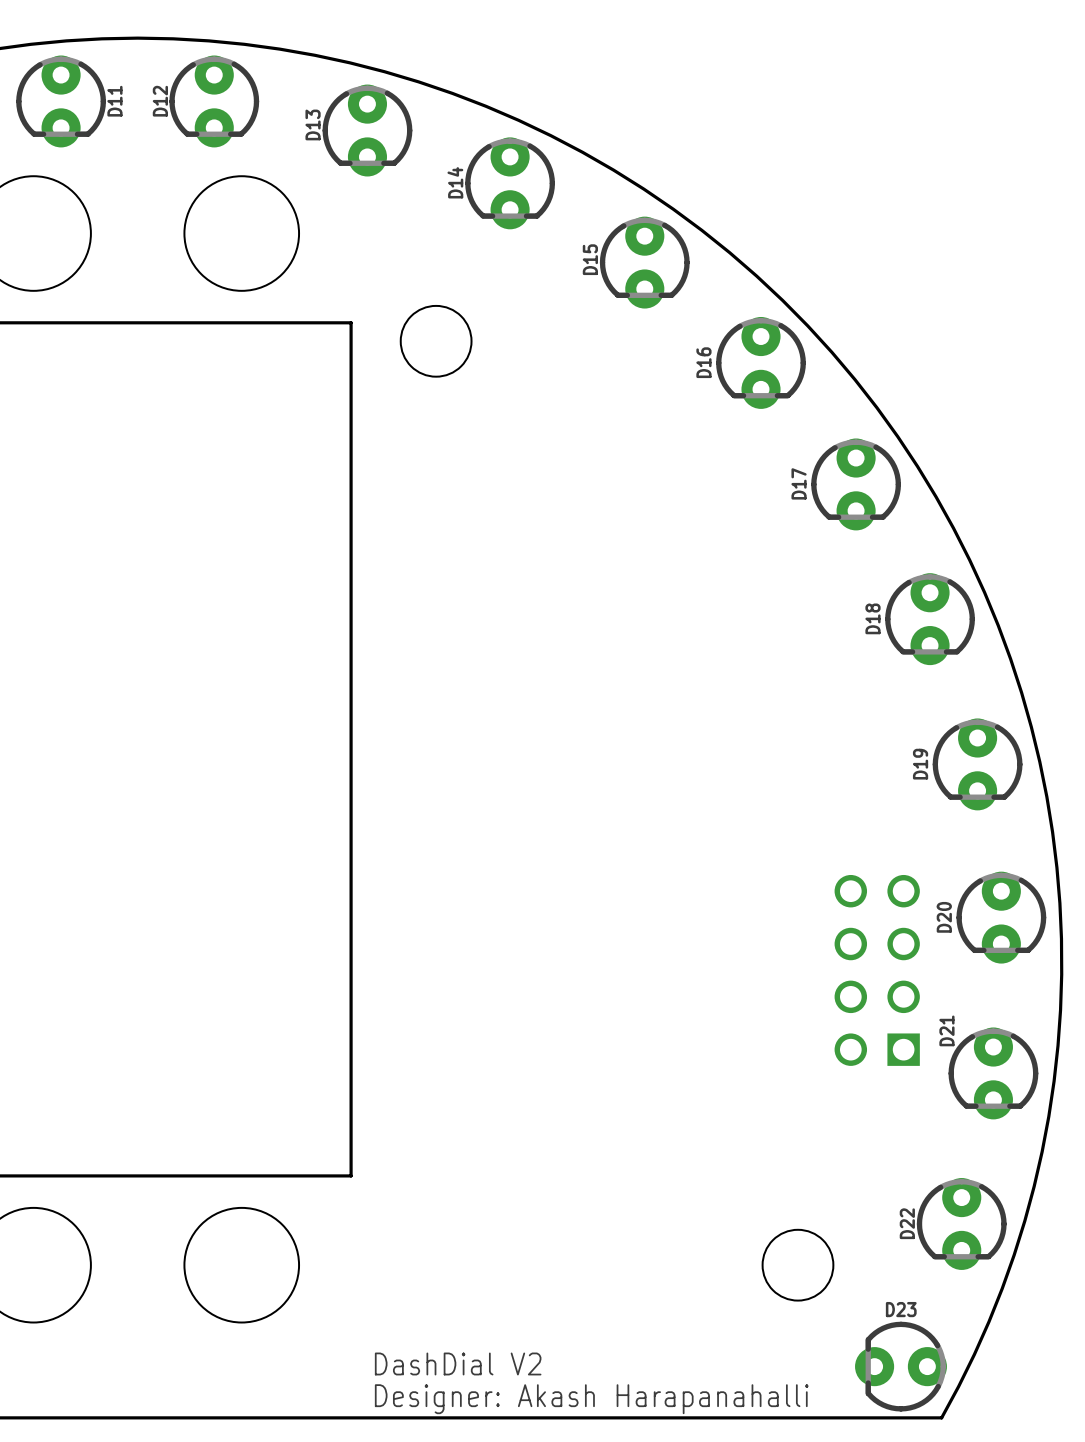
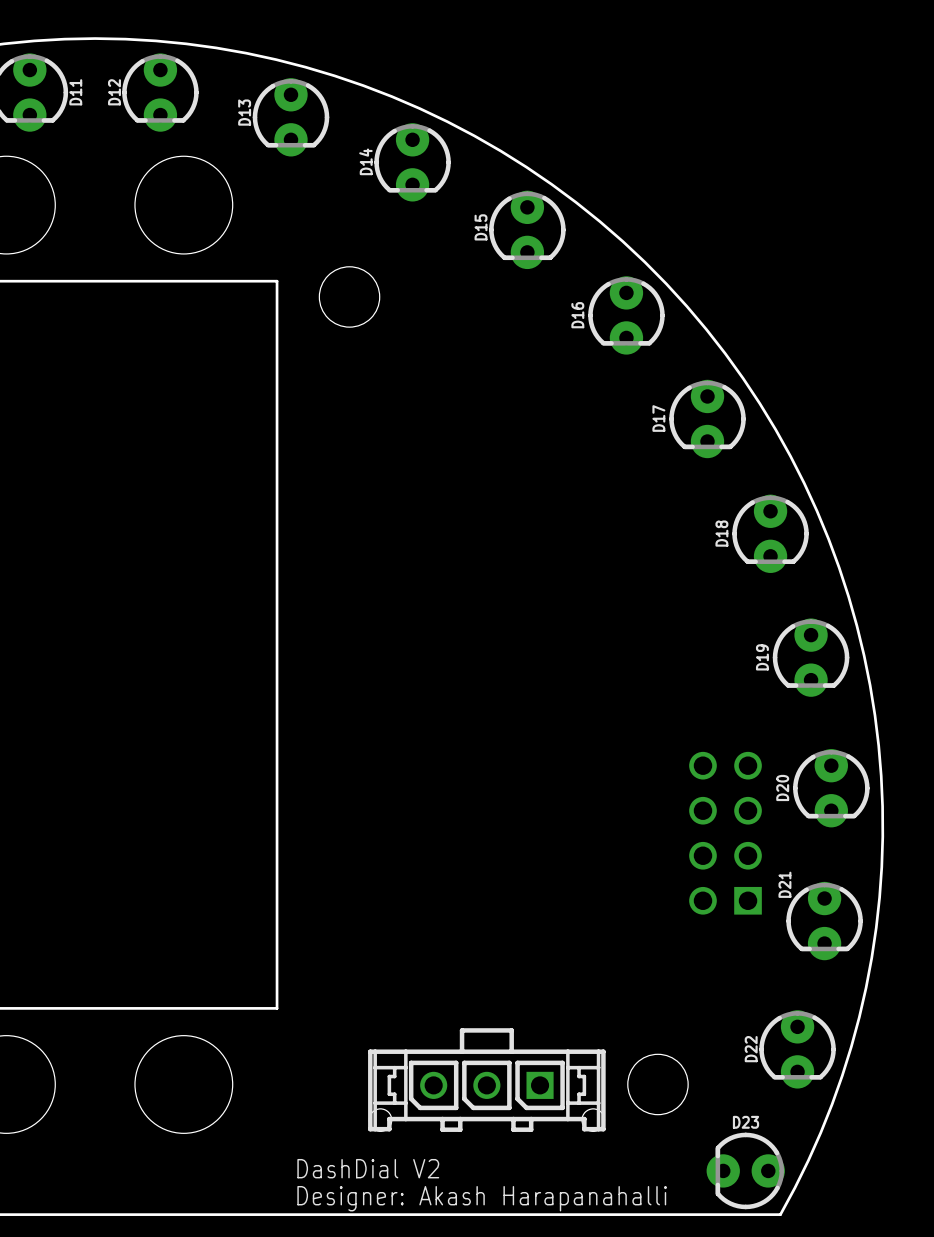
part: none -> (486, 1080)

